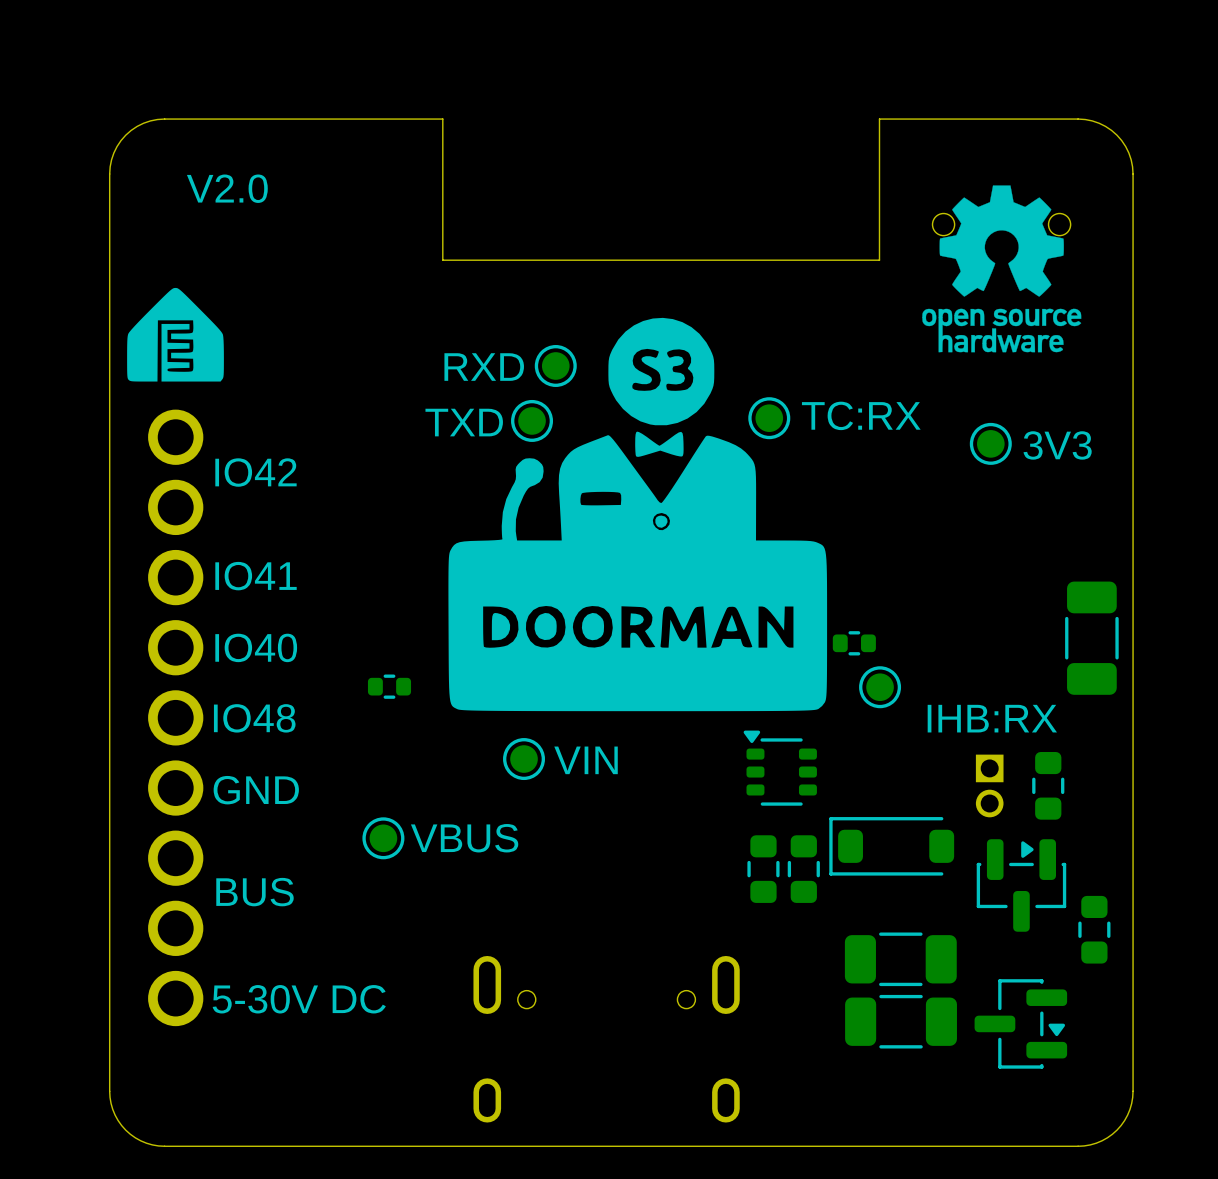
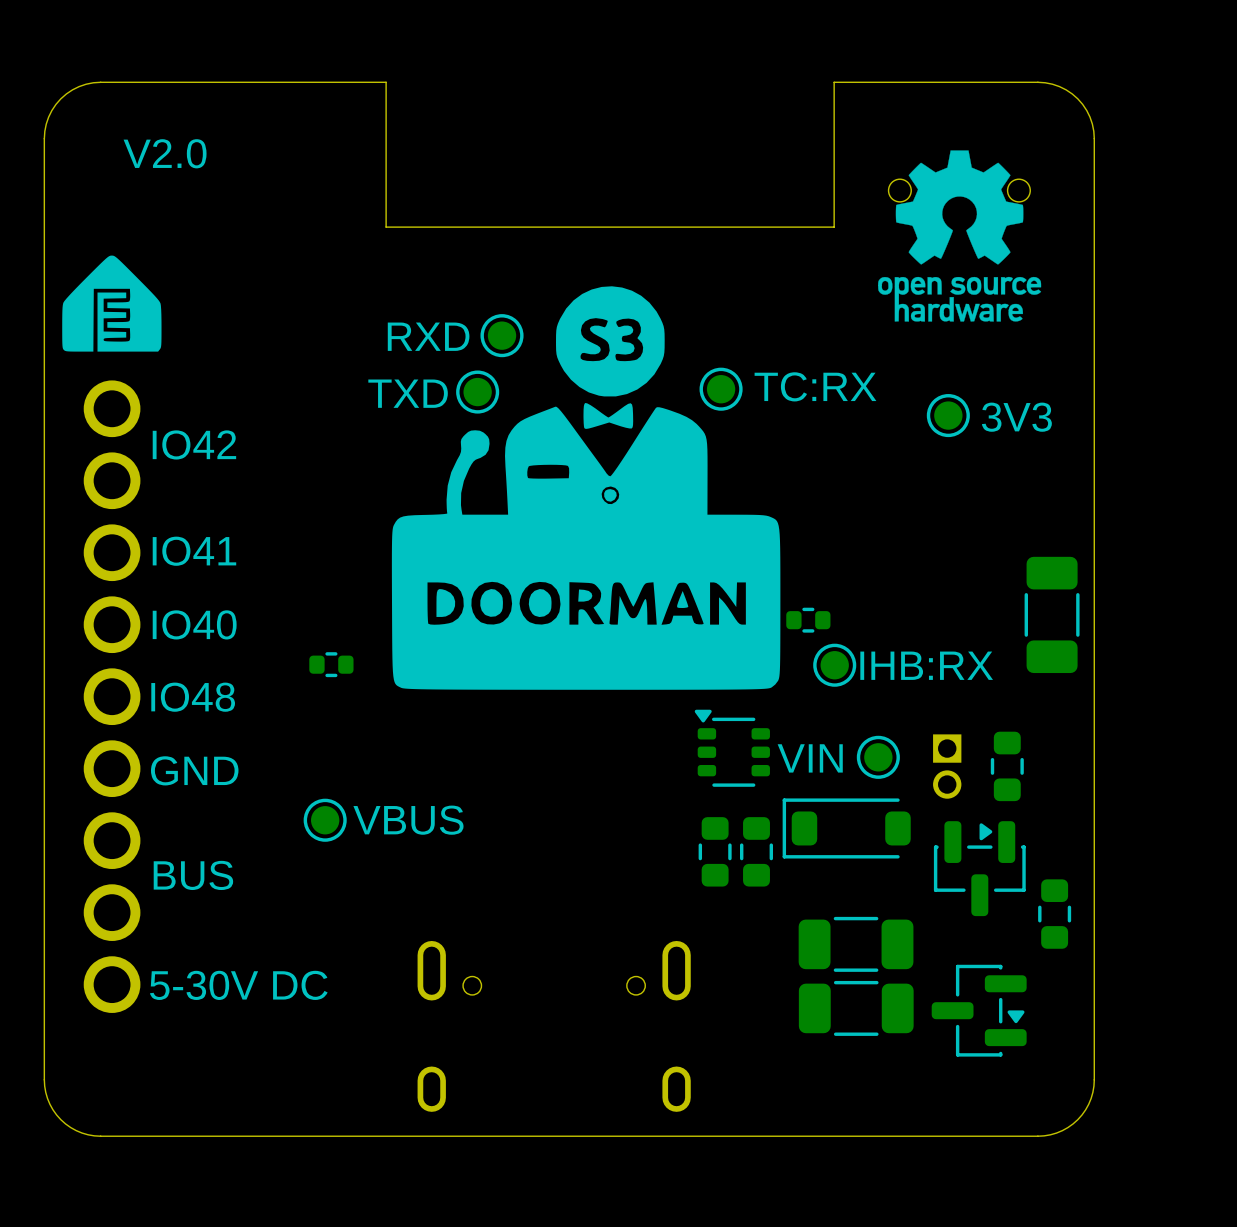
text position: IHB:RX (992, 718) -> IHB:RX (926, 665)
part position: (524, 759) -> (878, 757)
text position: VIN (586, 760) -> VIN (810, 758)

